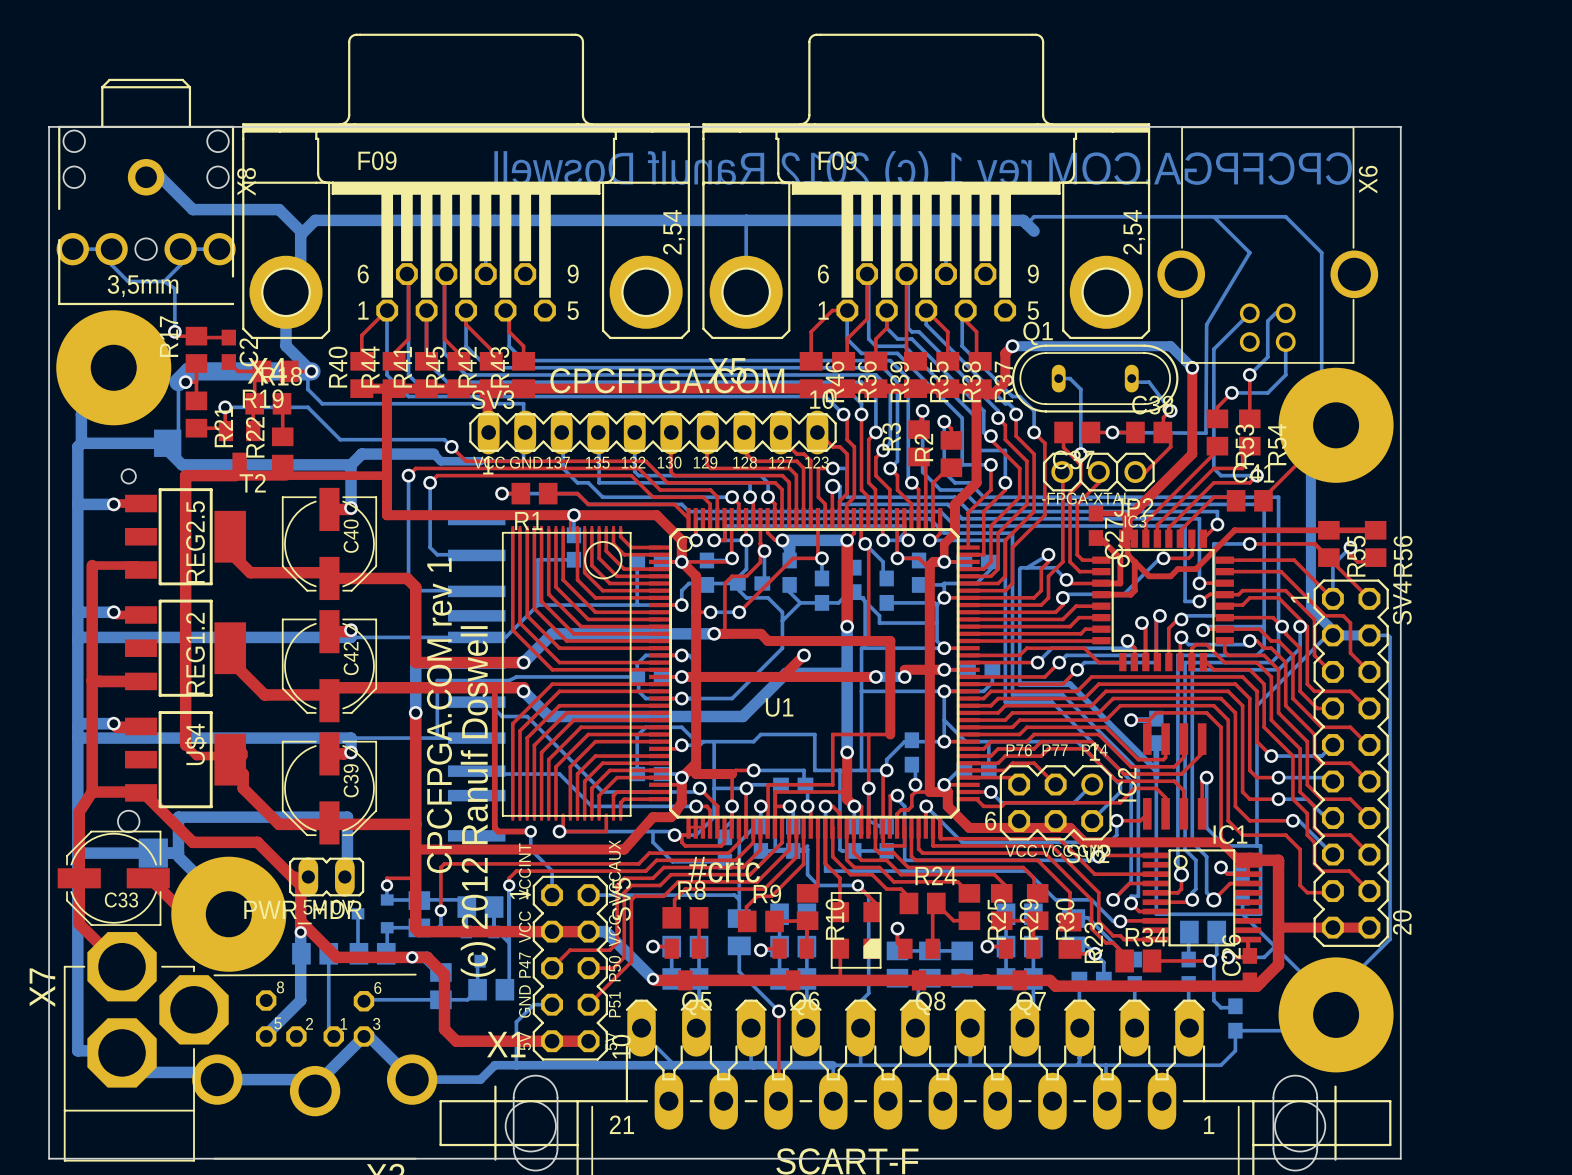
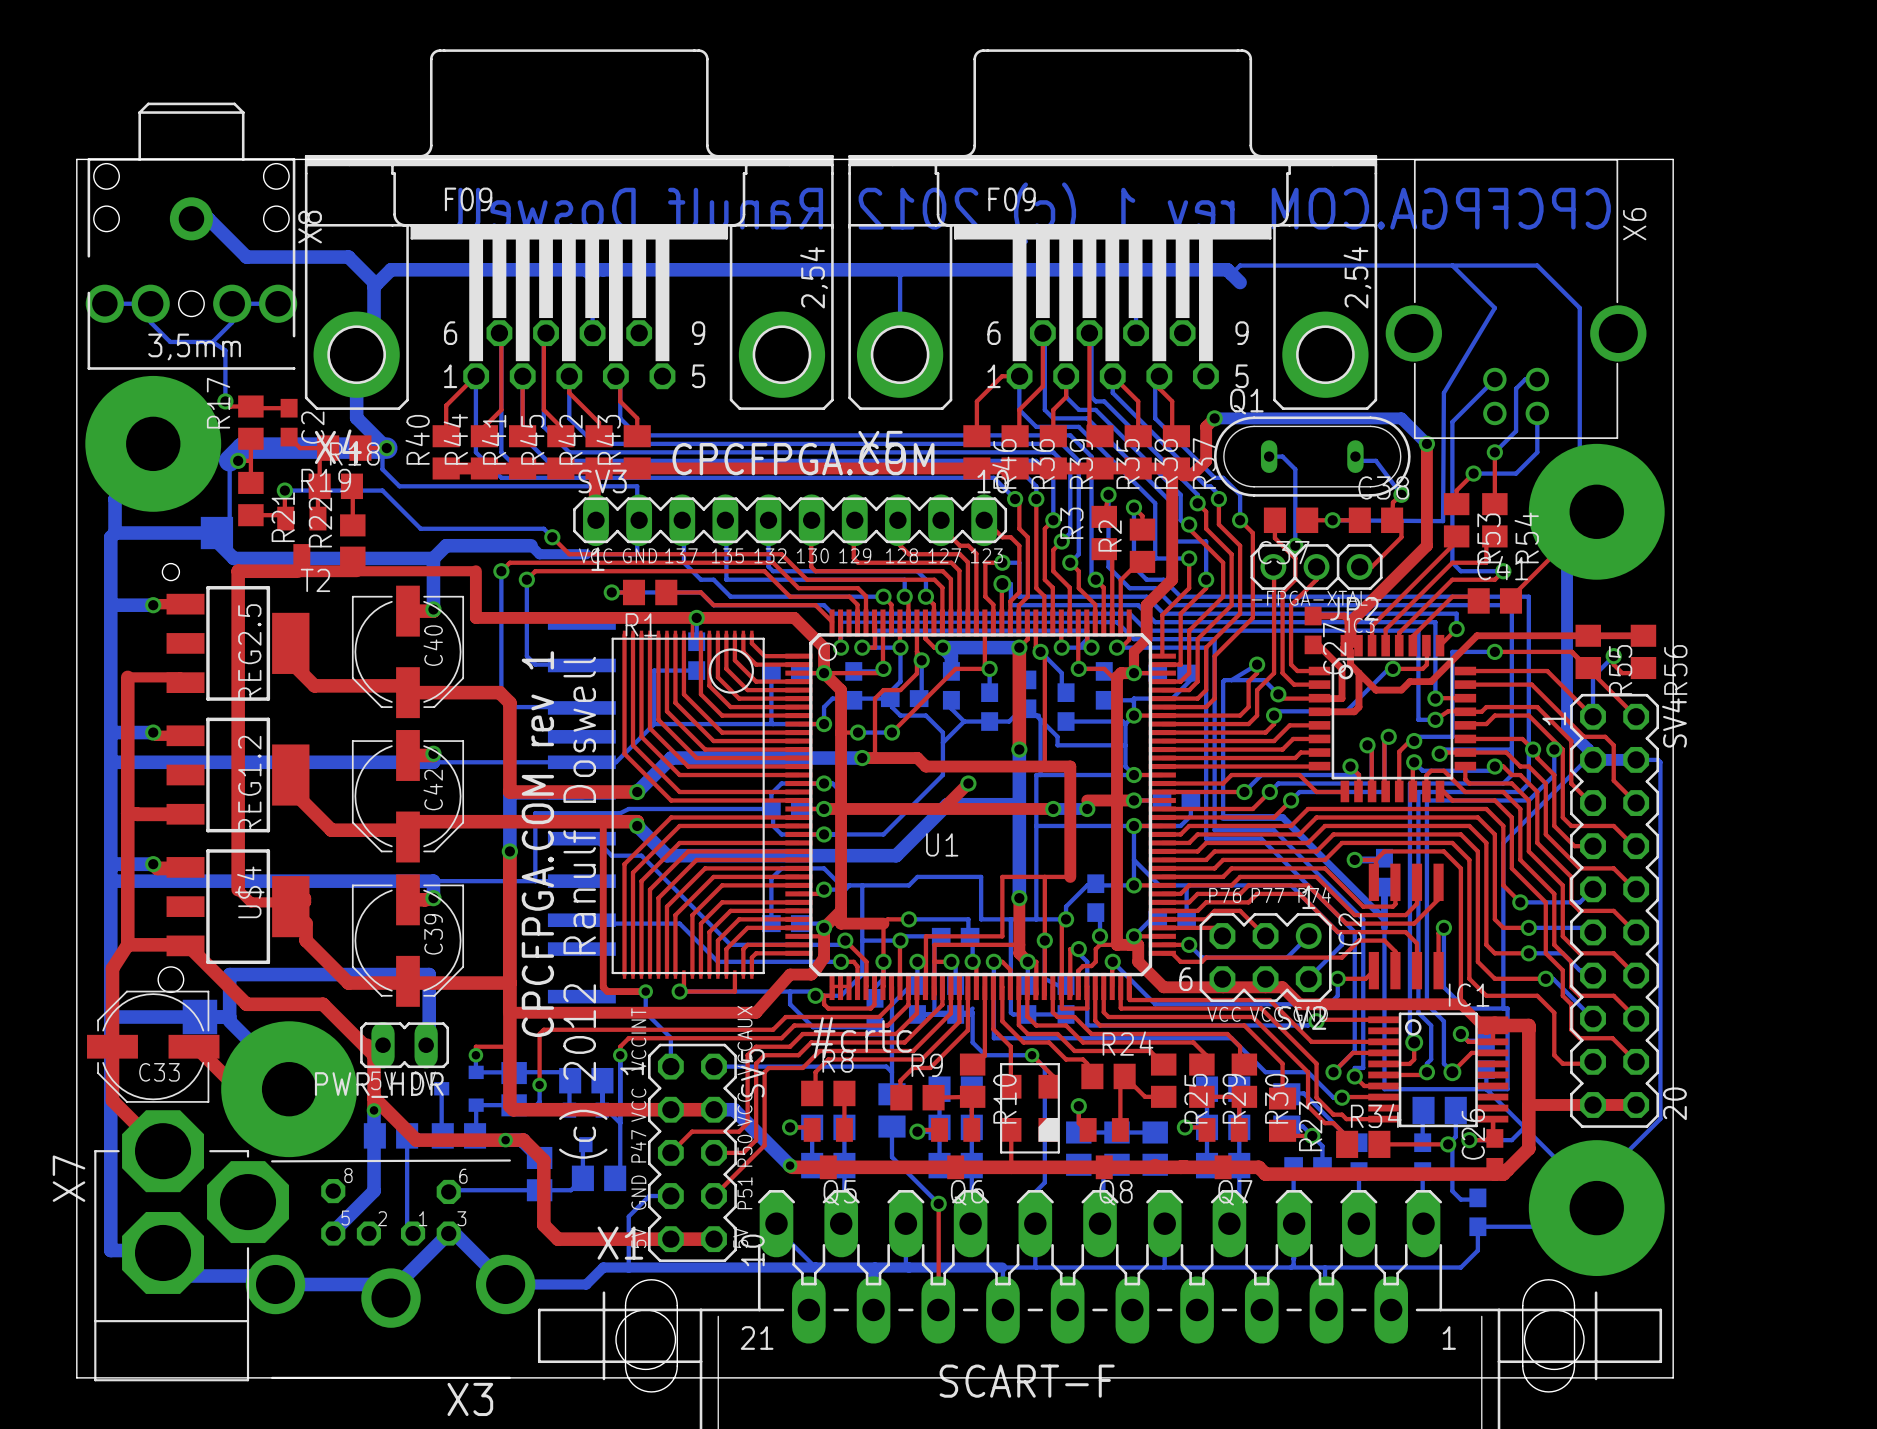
top track: (386, 388) (386, 475) -> none

